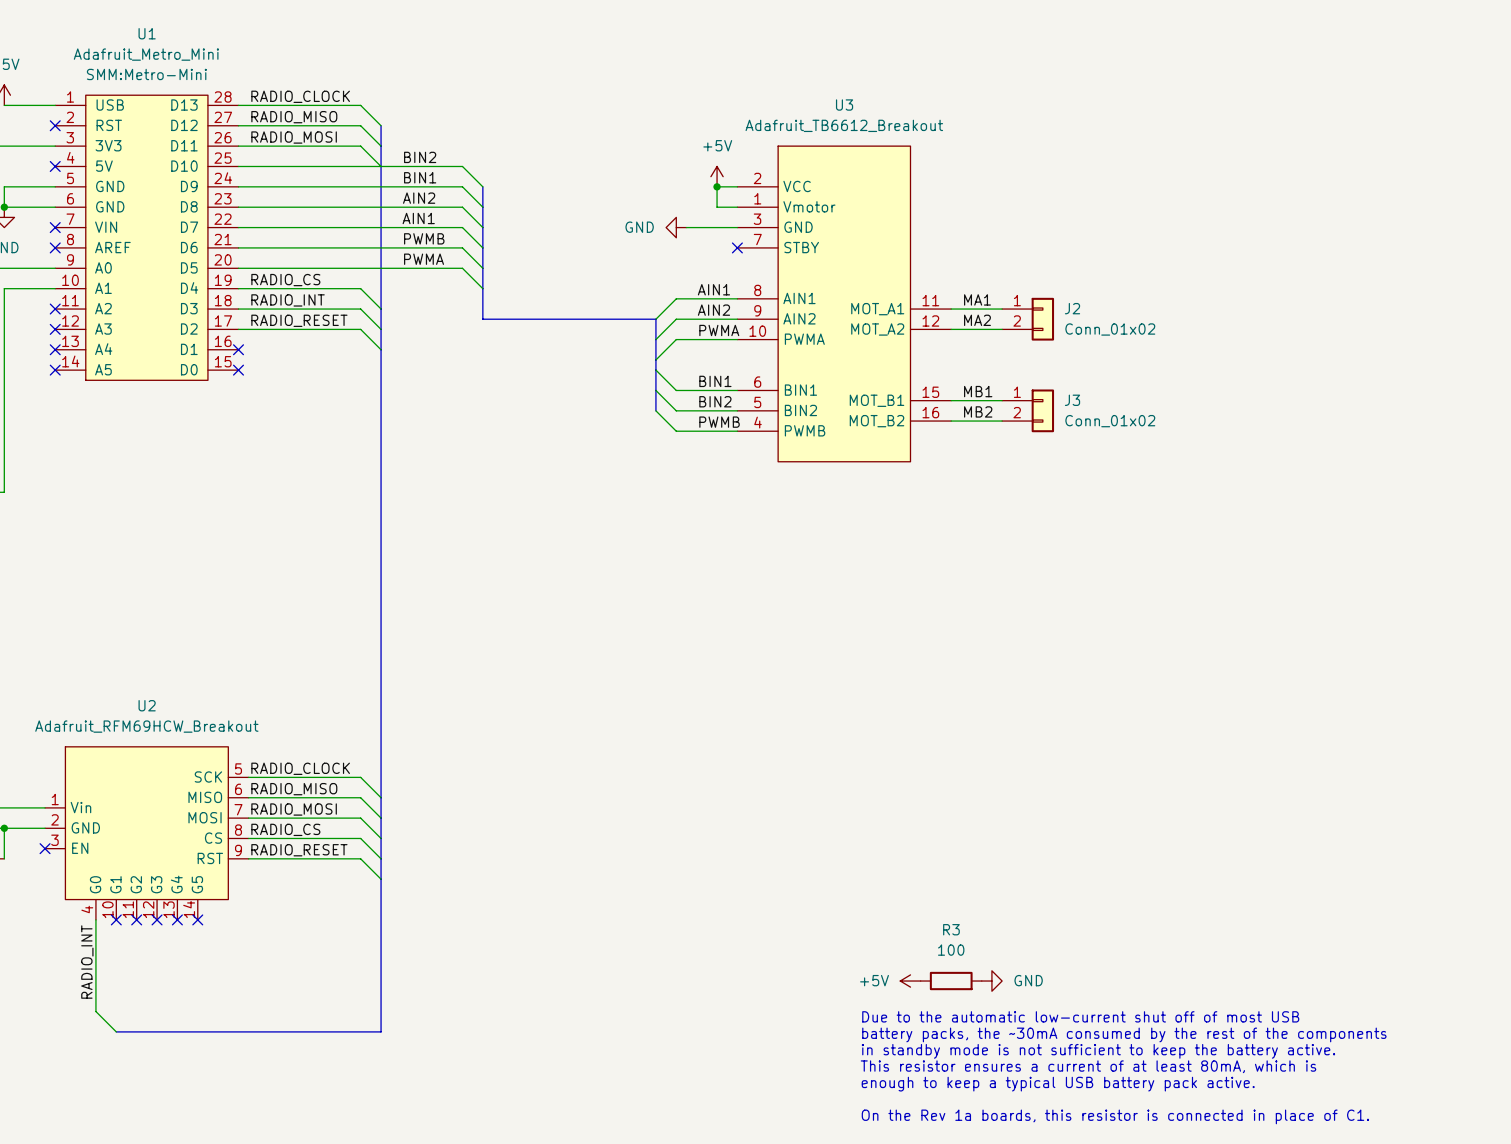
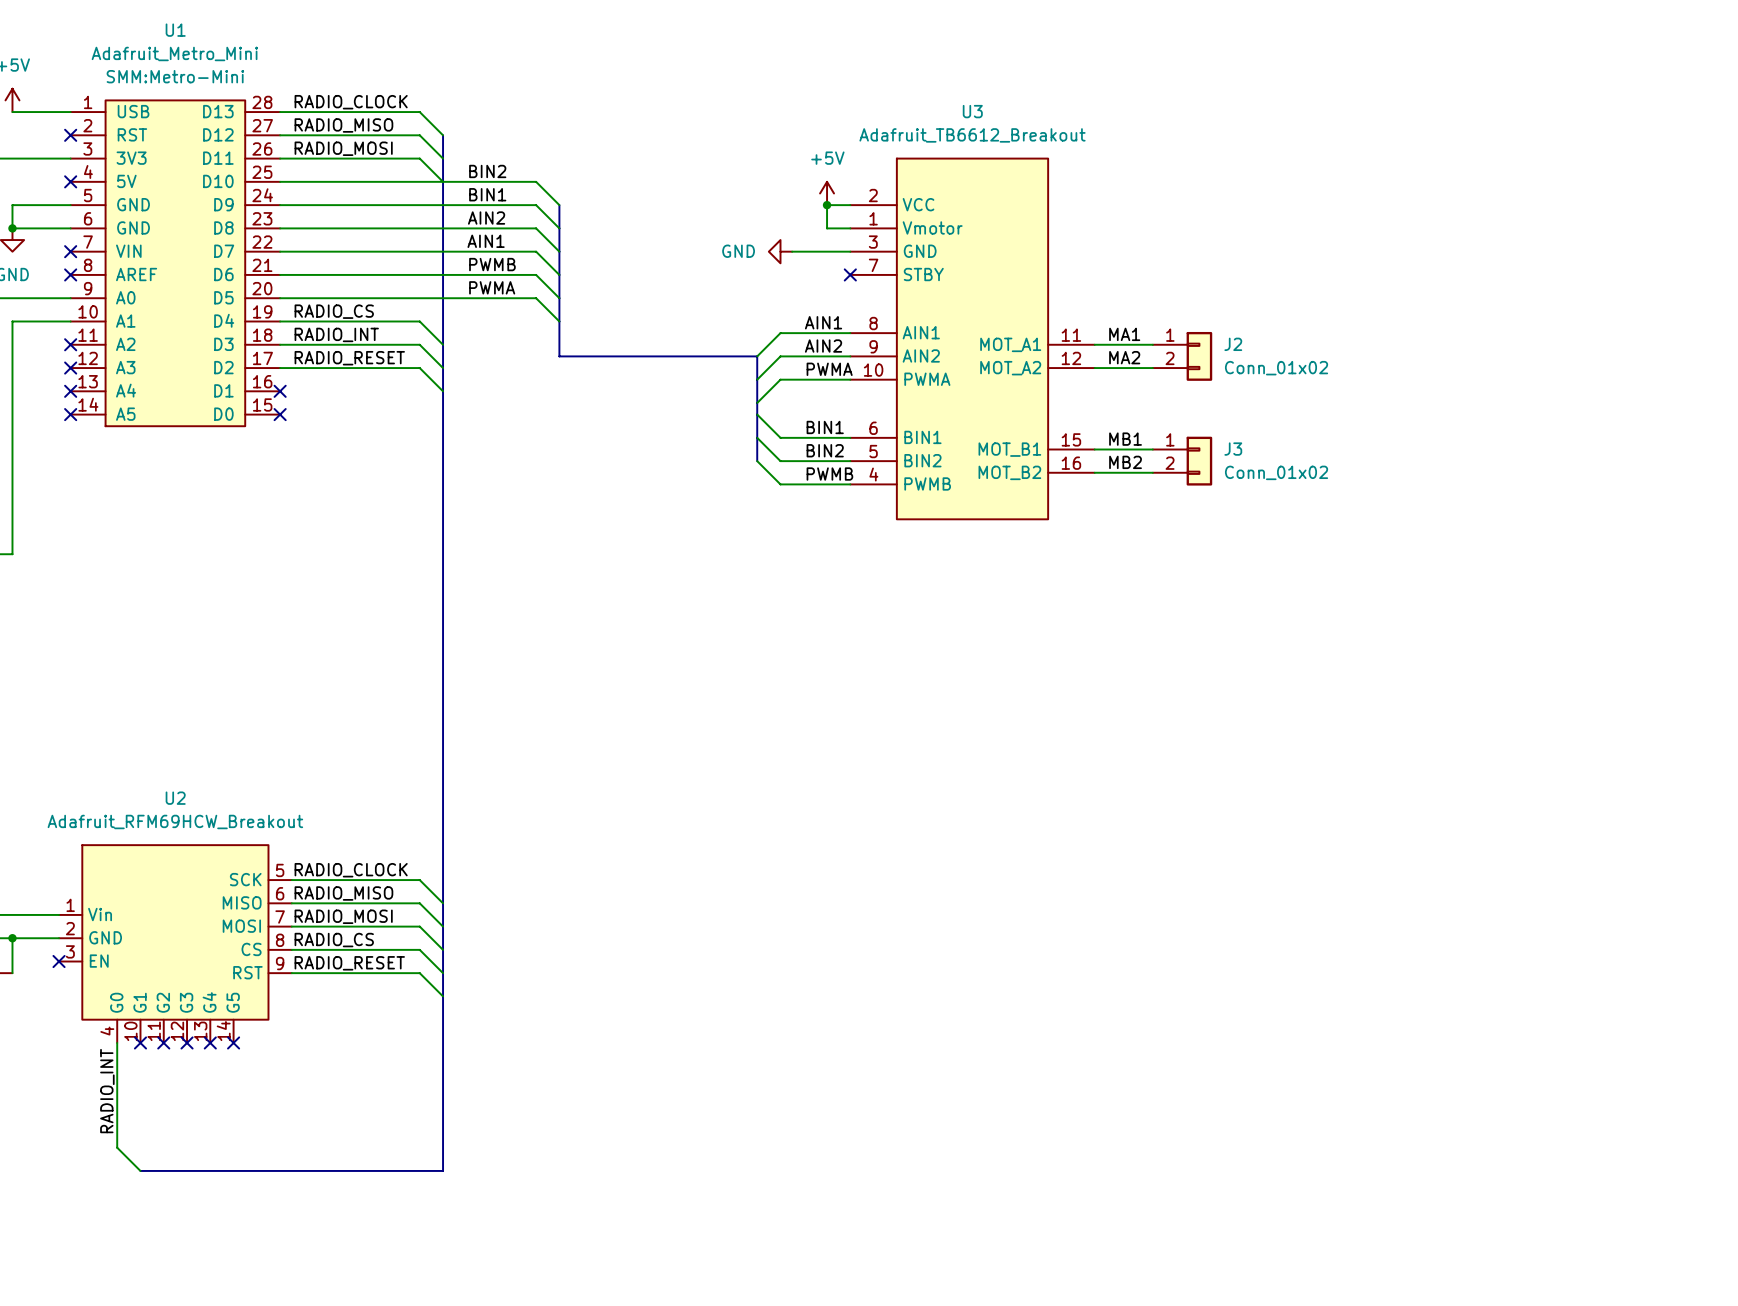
power symbol: +5V (910, 981) -> none
R3: 100 (951, 981) -> none
power symbol: GND (991, 981) -> none
text: Due to the automatic low-current shut off of most USB (1080, 1016) -> none
text: battery packs, the ~30mA consumed by the rest of the components (1124, 1034) -> none
text: in standby mode is not sufficient to keep the battery active. (1098, 1051) -> none
text: This resistor ensures a current of at least 80mA, which is (1088, 1066) -> none
text: enough to keep a typical USB battery pack active. (1058, 1084) -> none
text: On the Rev 1a boards, this resistor is connected in place of C1. (1115, 1116) -> none

